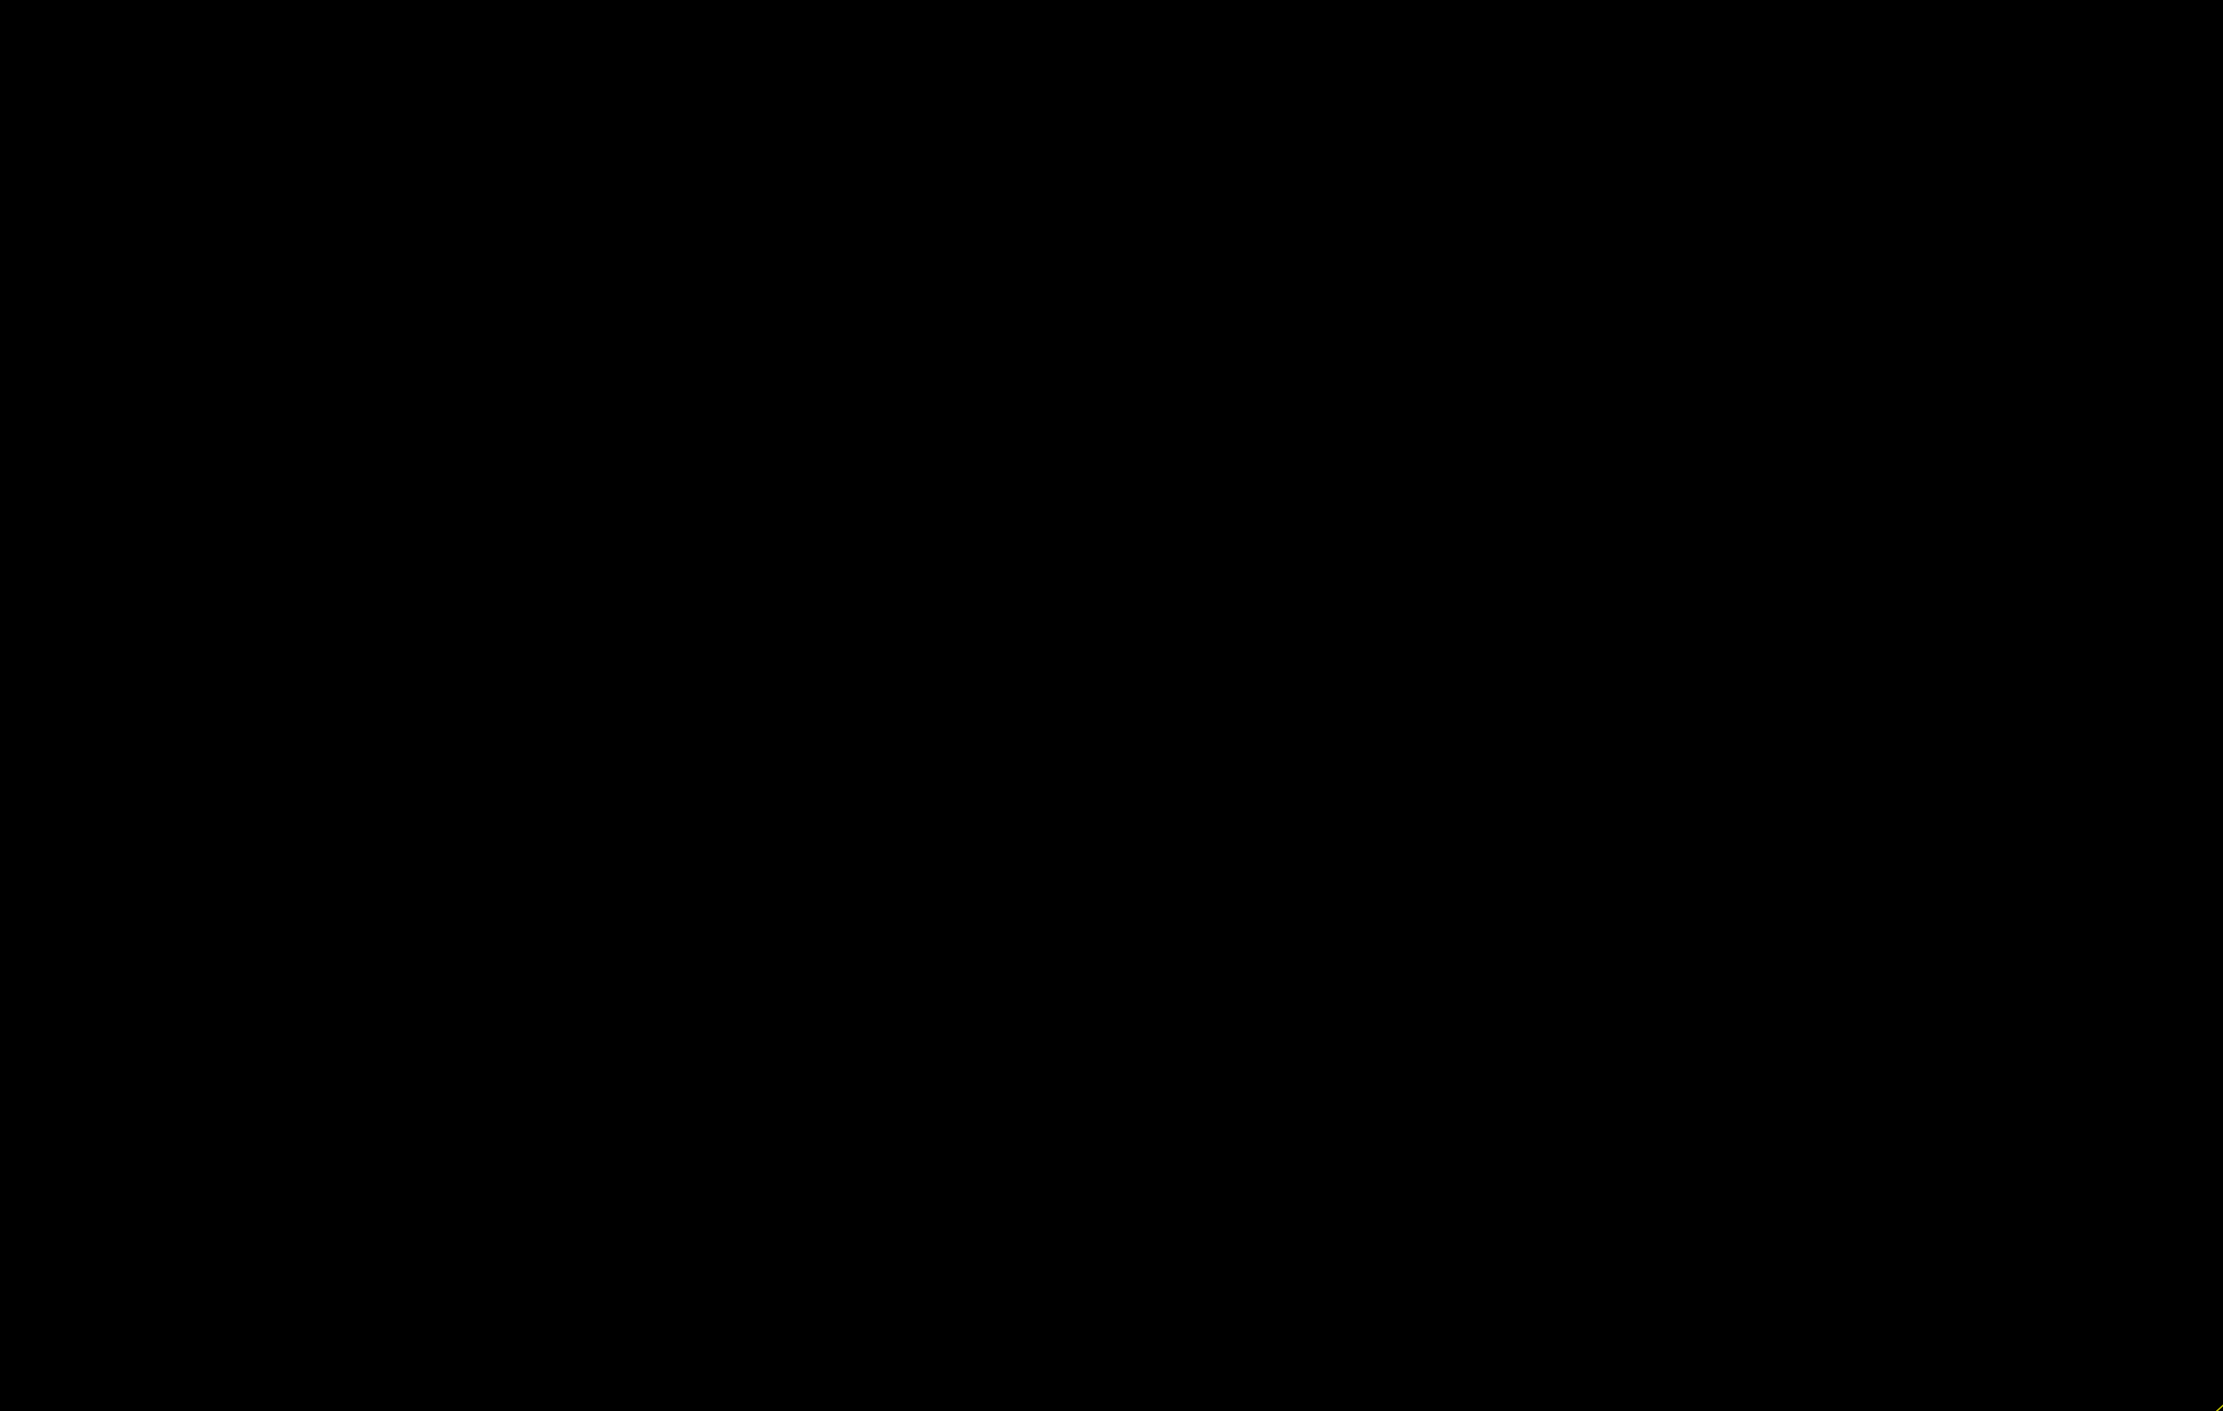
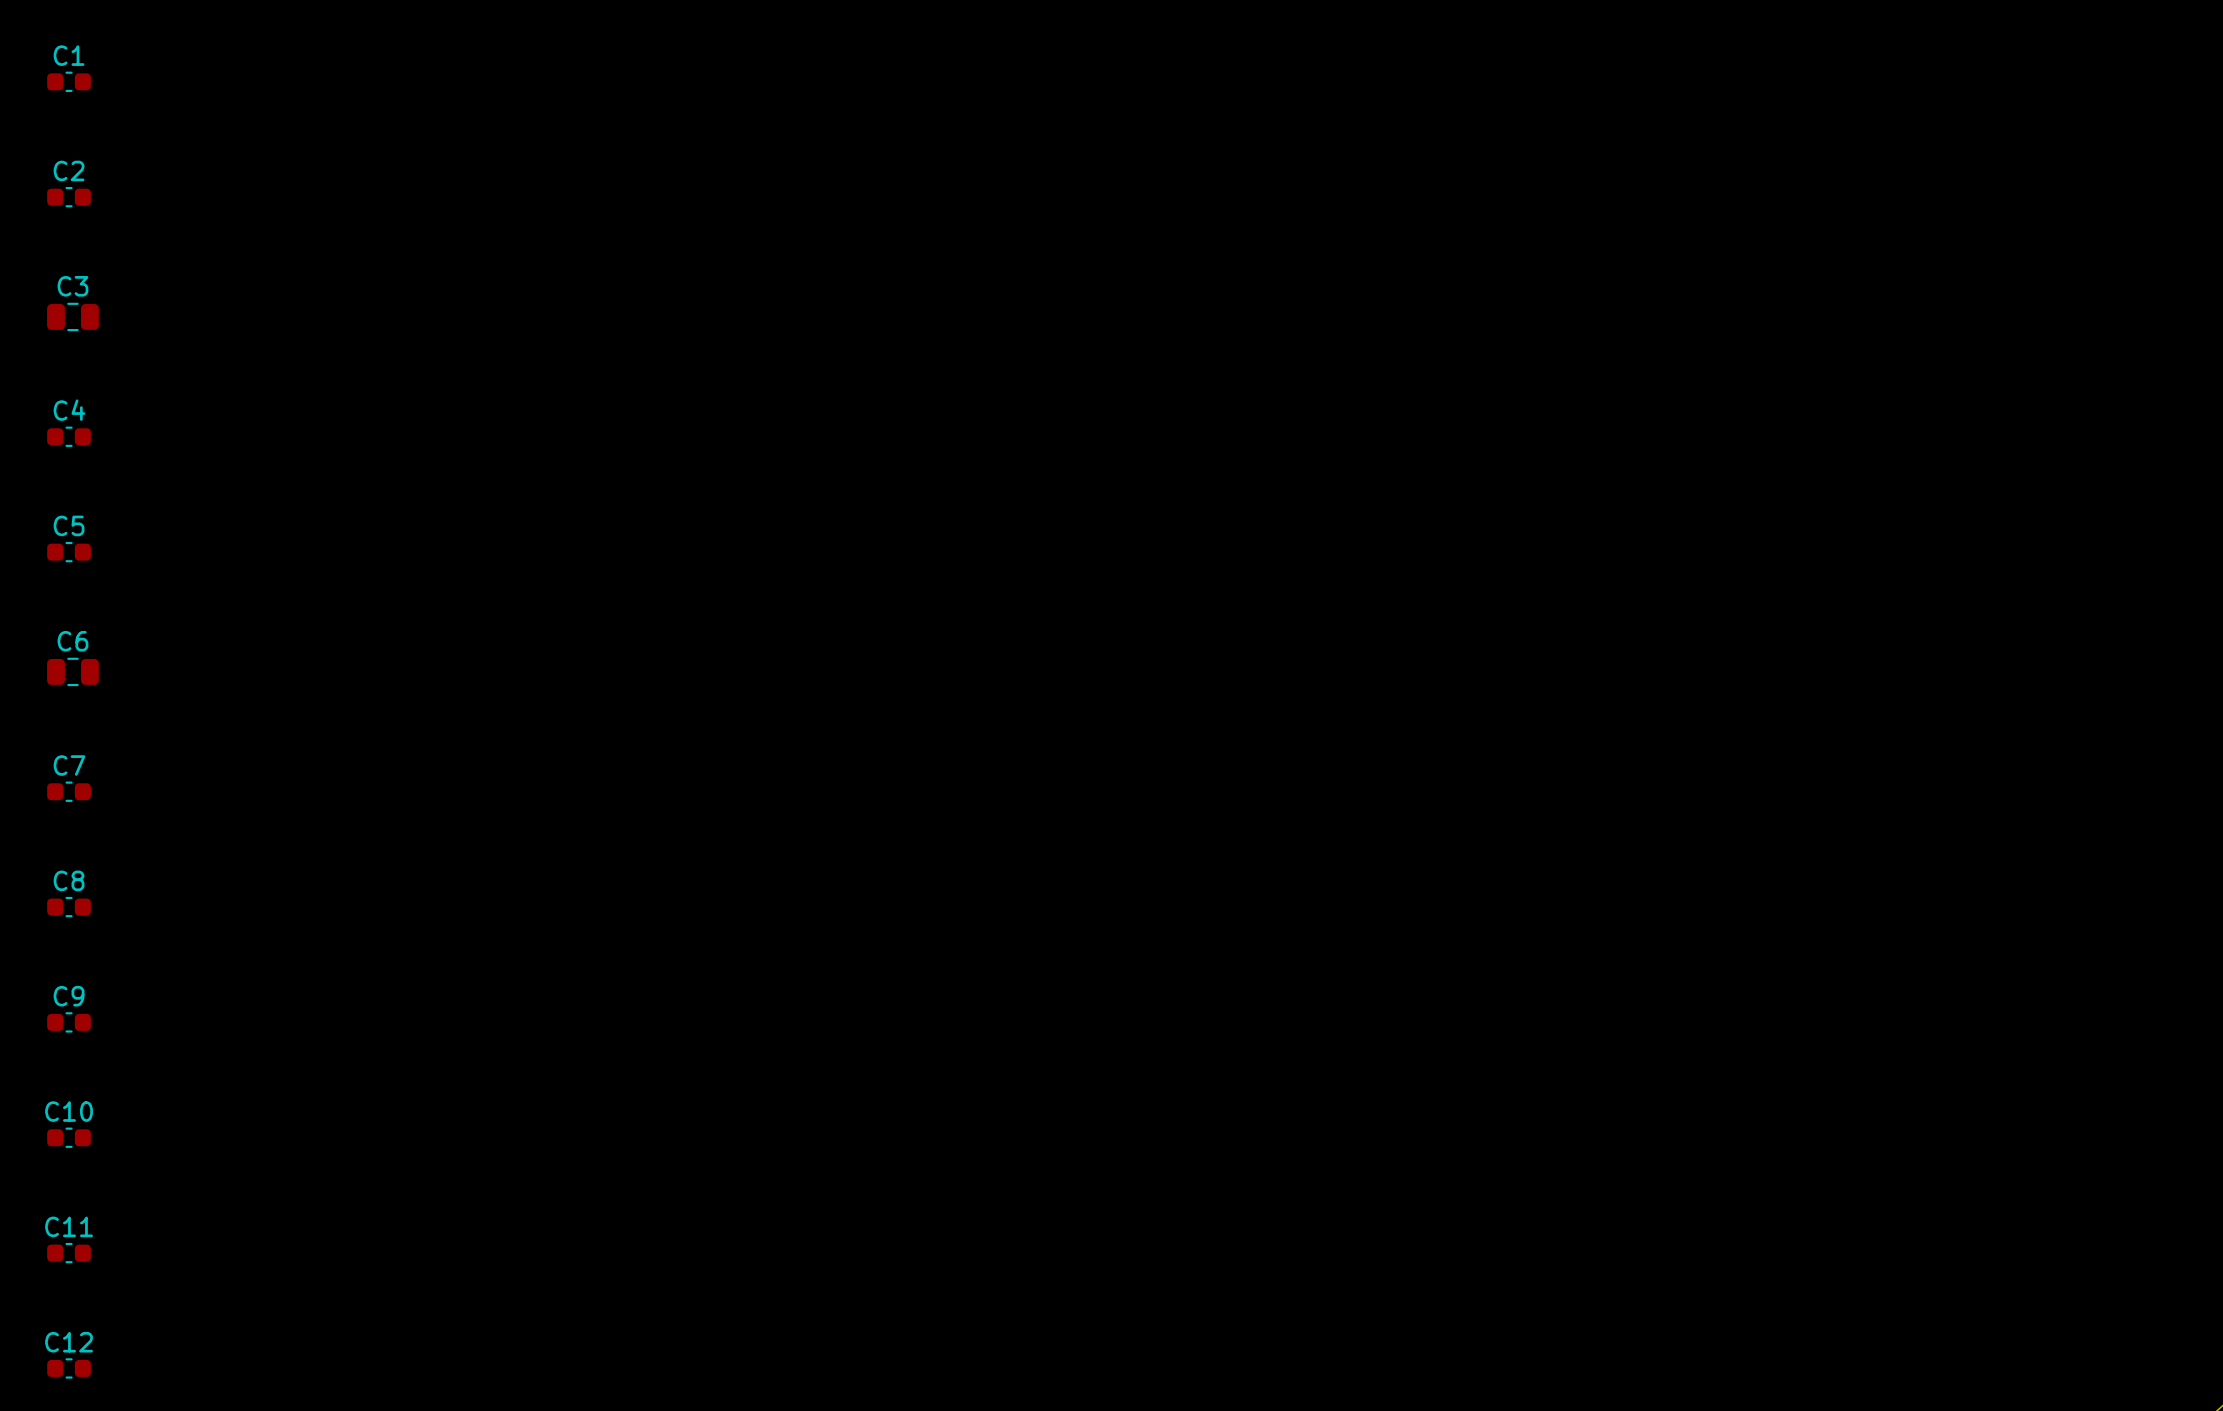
C1: none -> (69, 81)
C2: none -> (69, 197)
C3: none -> (72, 316)
C4: none -> (69, 436)
C5: none -> (69, 552)
C6: none -> (72, 671)
C7: none -> (69, 791)
C8: none -> (69, 907)
C9: none -> (69, 1022)
C10: none -> (69, 1137)
C11: none -> (69, 1253)
C12: none -> (69, 1368)

